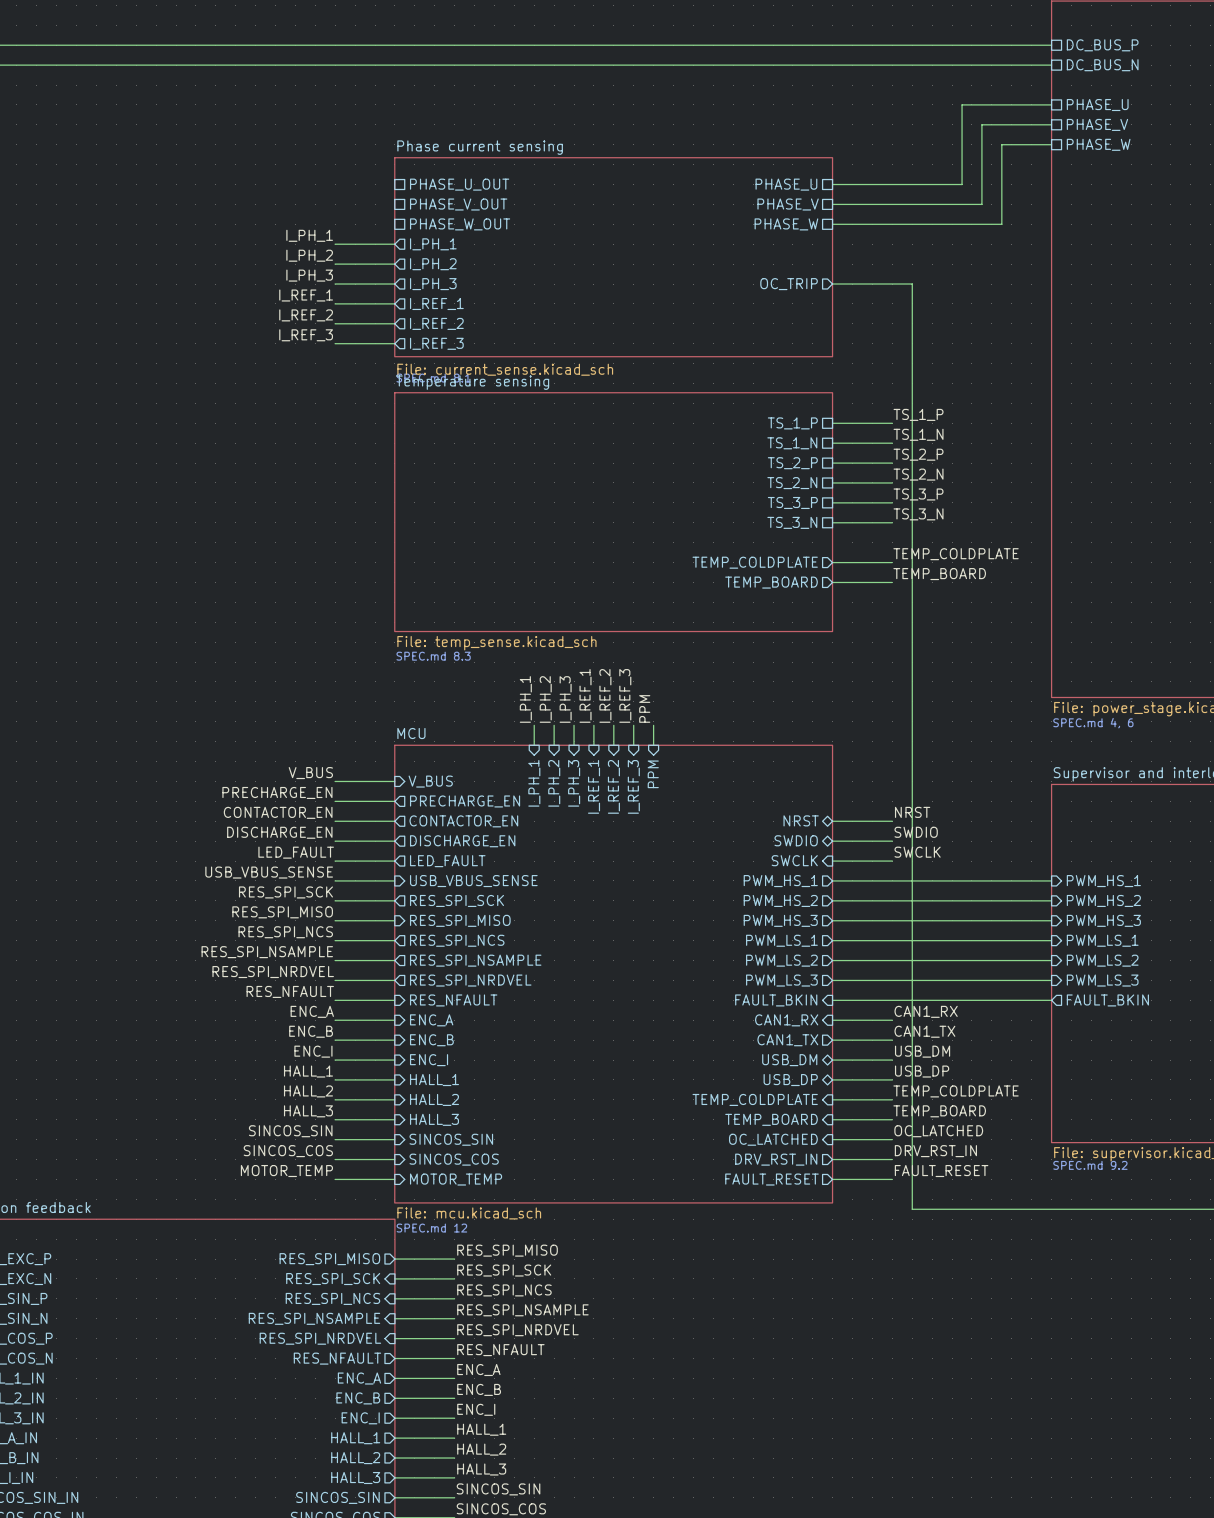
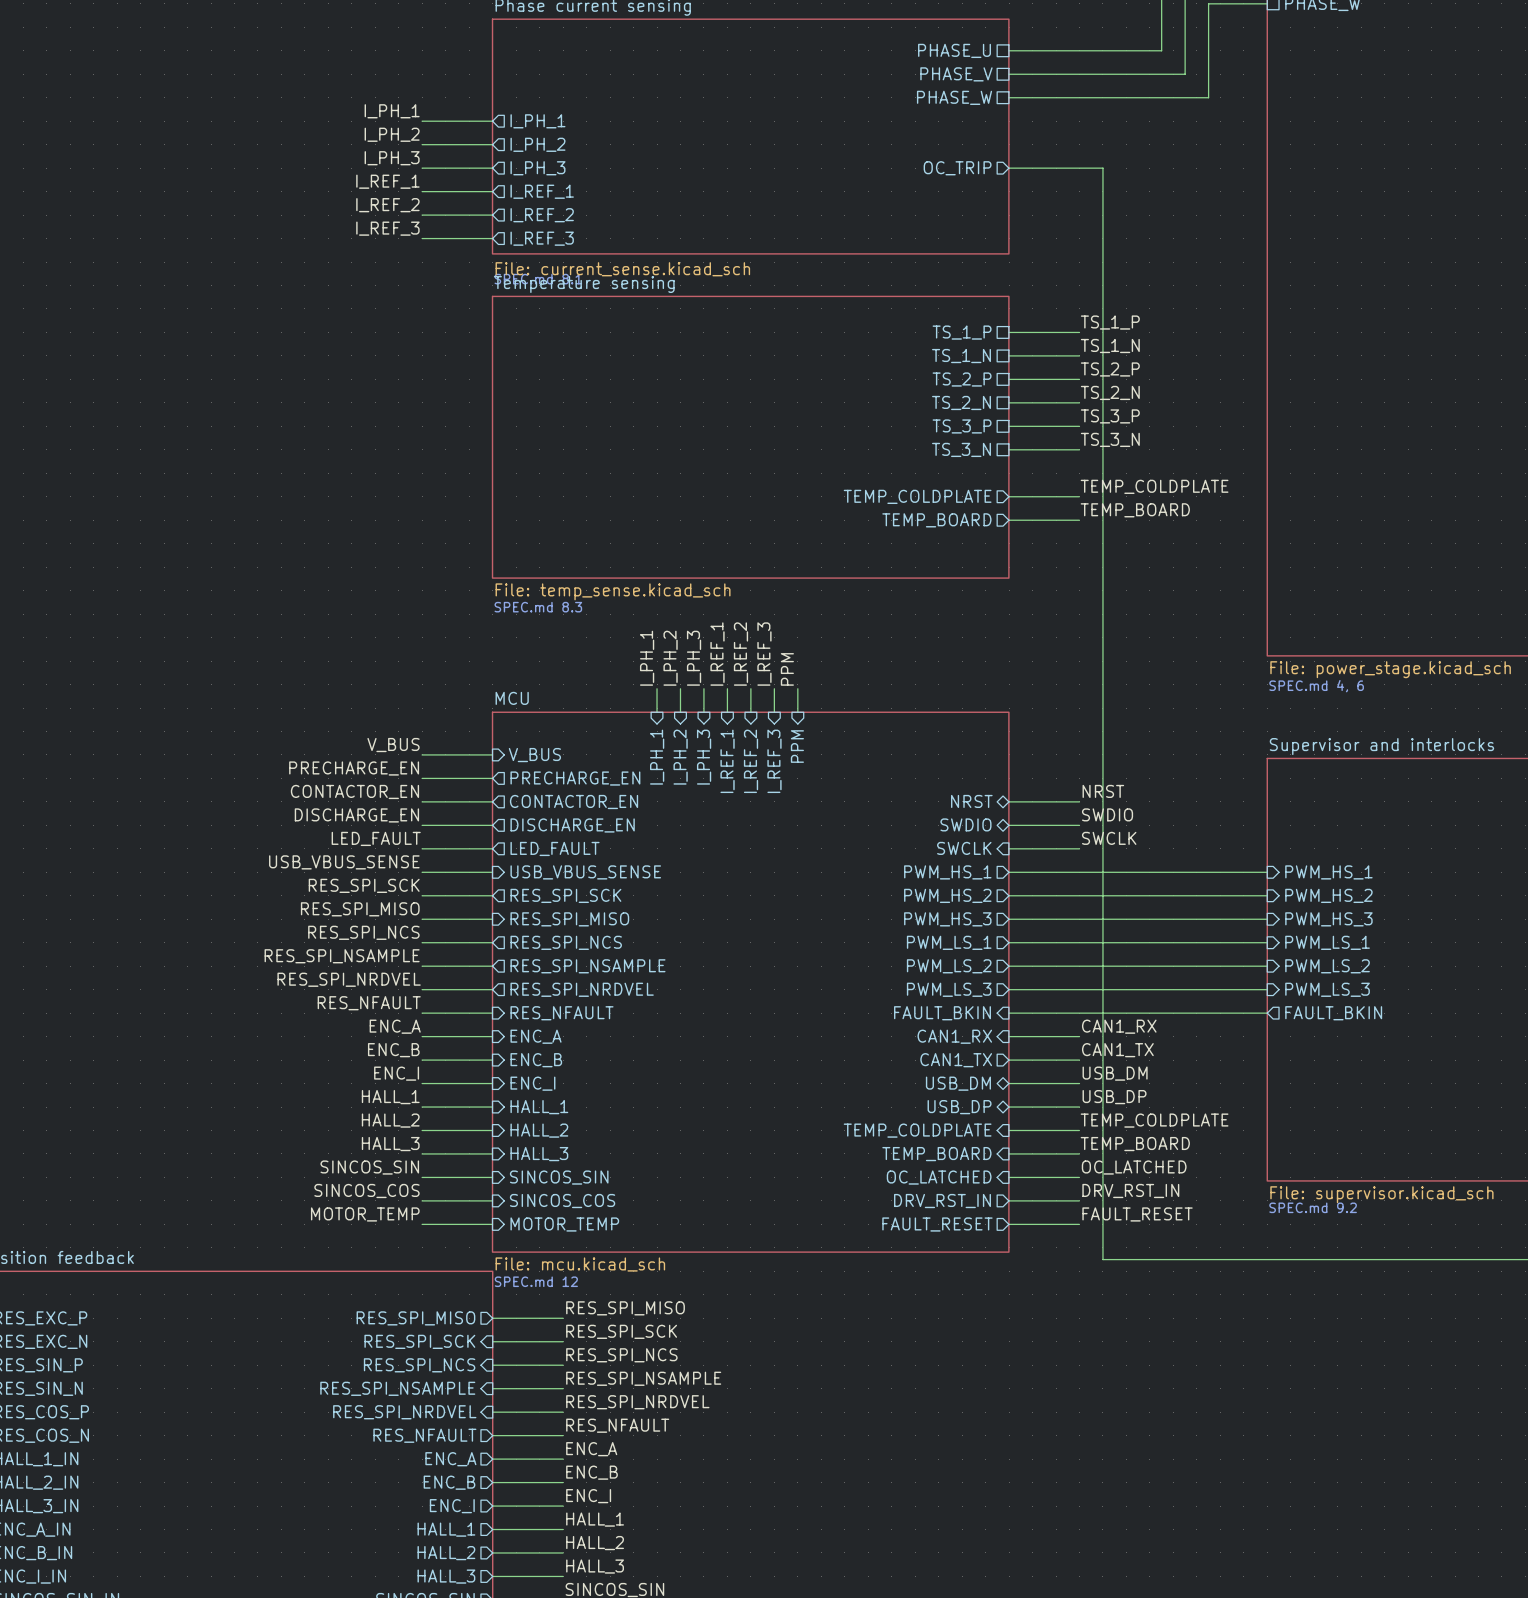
sheet pin: PHASE_U_OUT (459, 184) -> none
sheet pin: PHASE_V_OUT (458, 204) -> none
sheet pin: PHASE_W_OUT (460, 224) -> none

